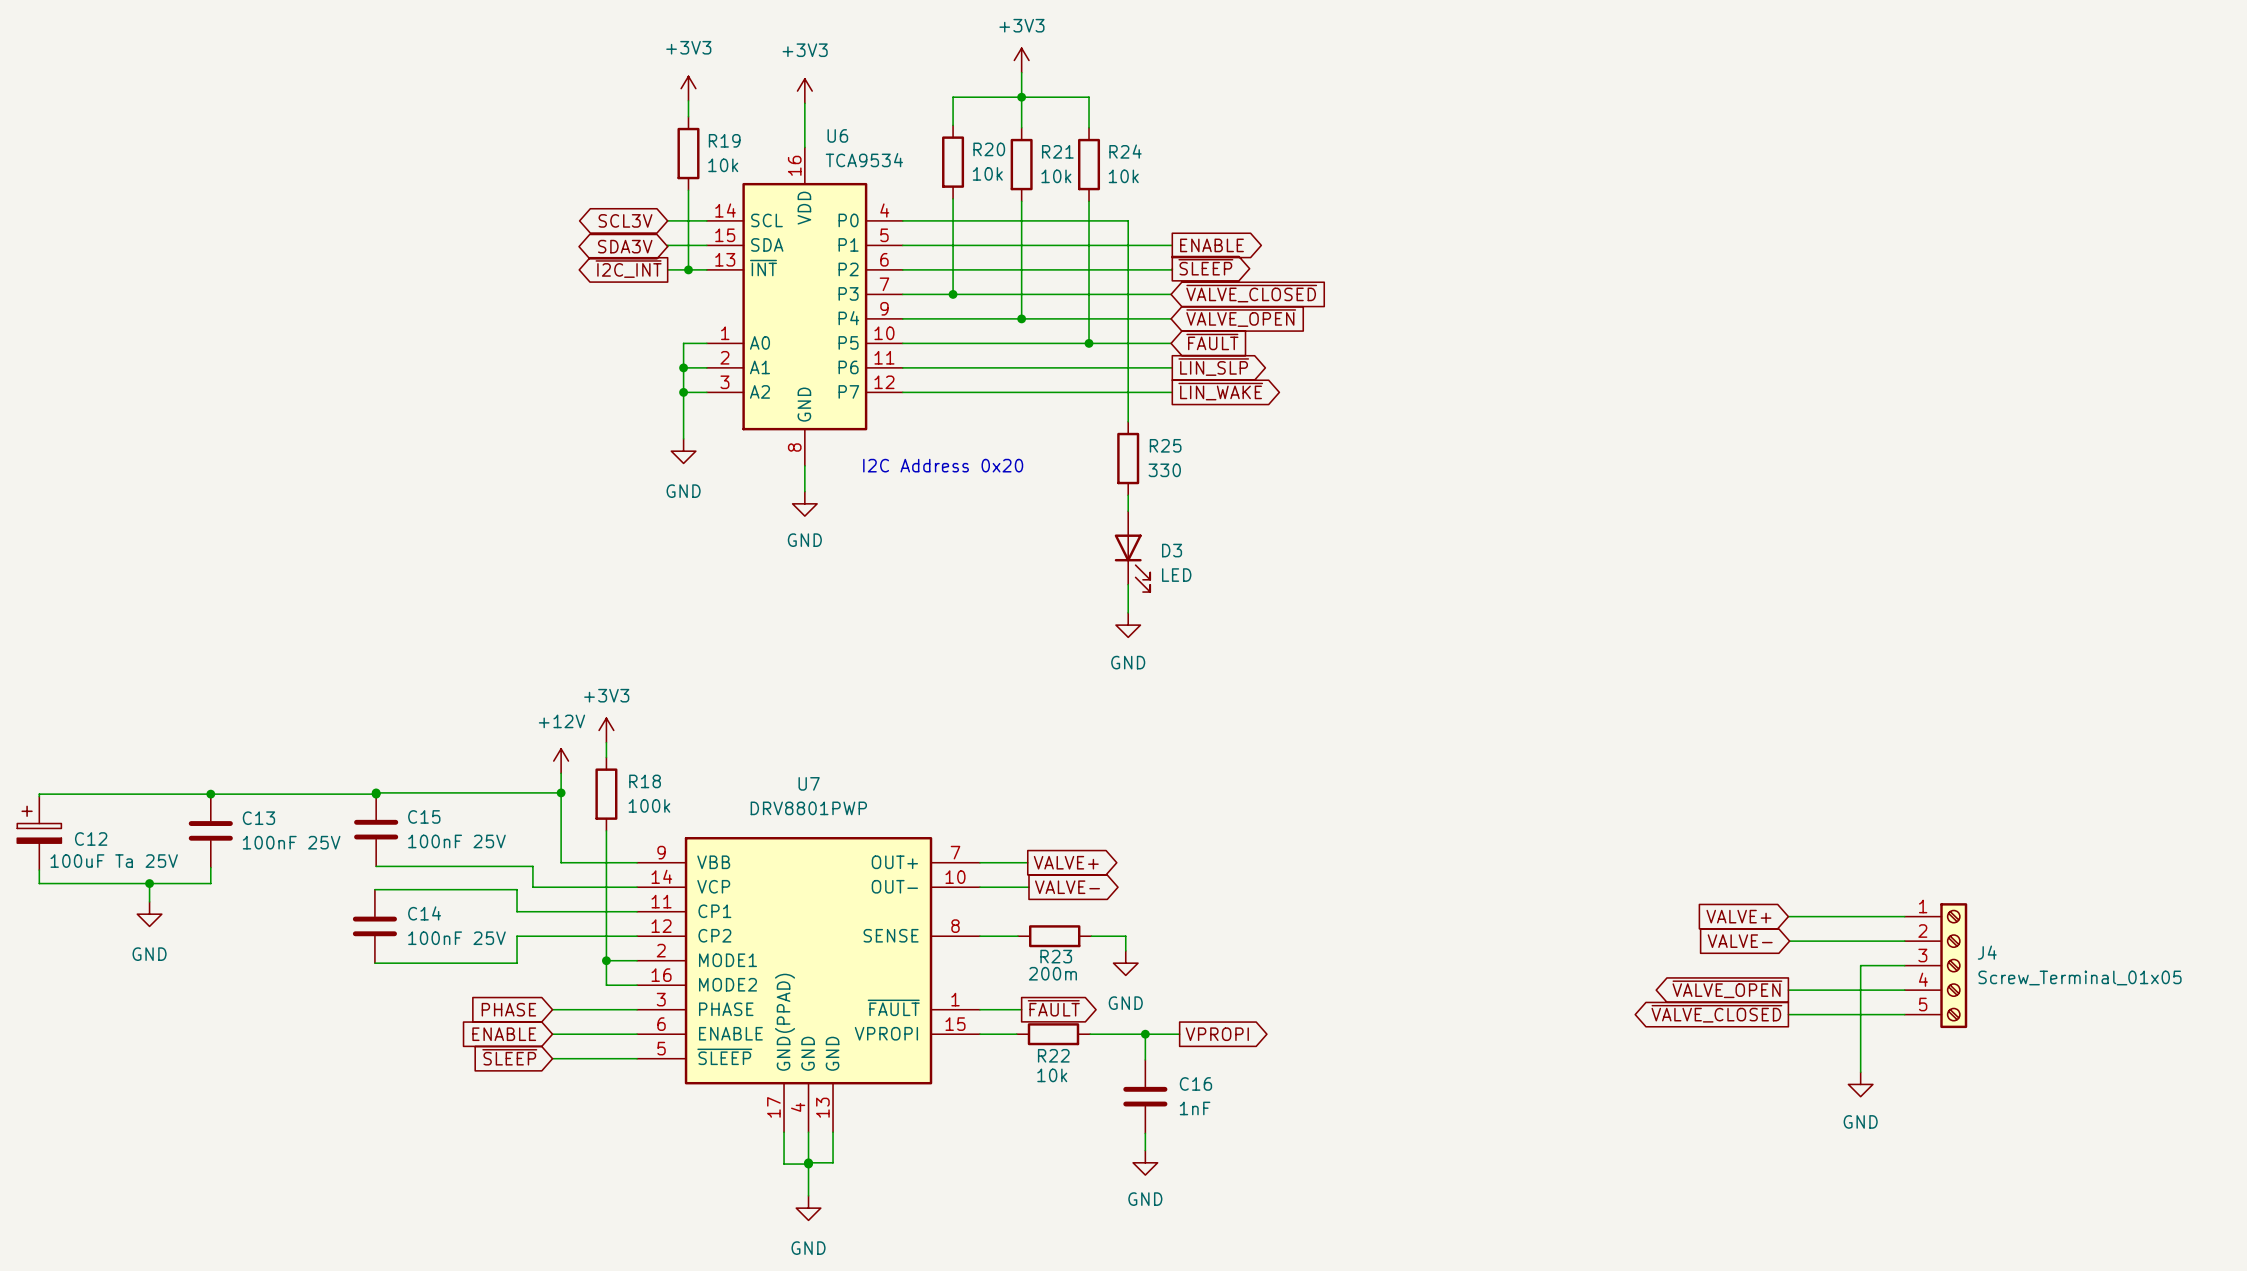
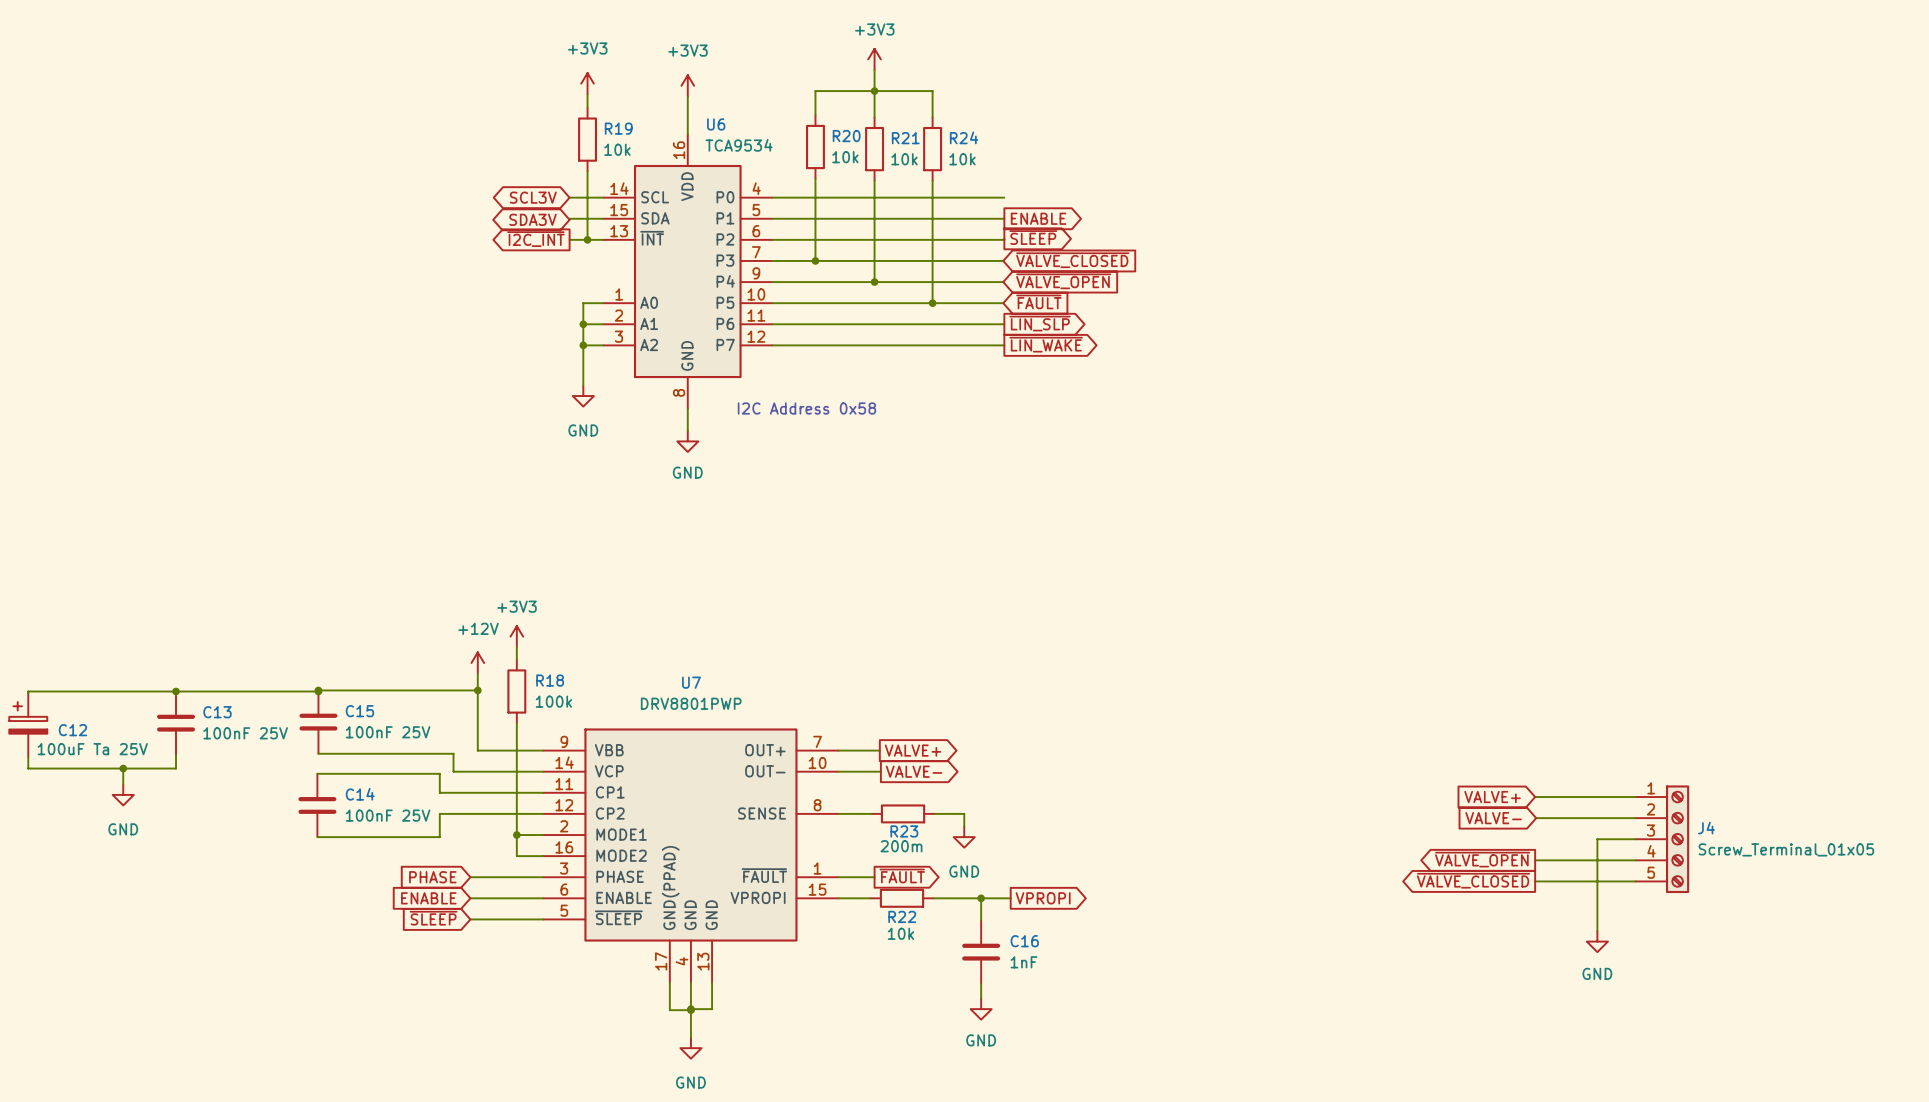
wire: (1128, 220) (1128, 421) -> (966, 197) (1004, 197)
R25: 330 (1128, 458) -> none
text: I2C Address 0x20 (943, 465) -> I2C Address 0x58 (806, 408)
wire: (1128, 495) (1128, 511) -> none
D3: LED (1132, 551) -> none
wire: (1128, 584) (1128, 612) -> none
power symbol: GND (1128, 625) -> none

